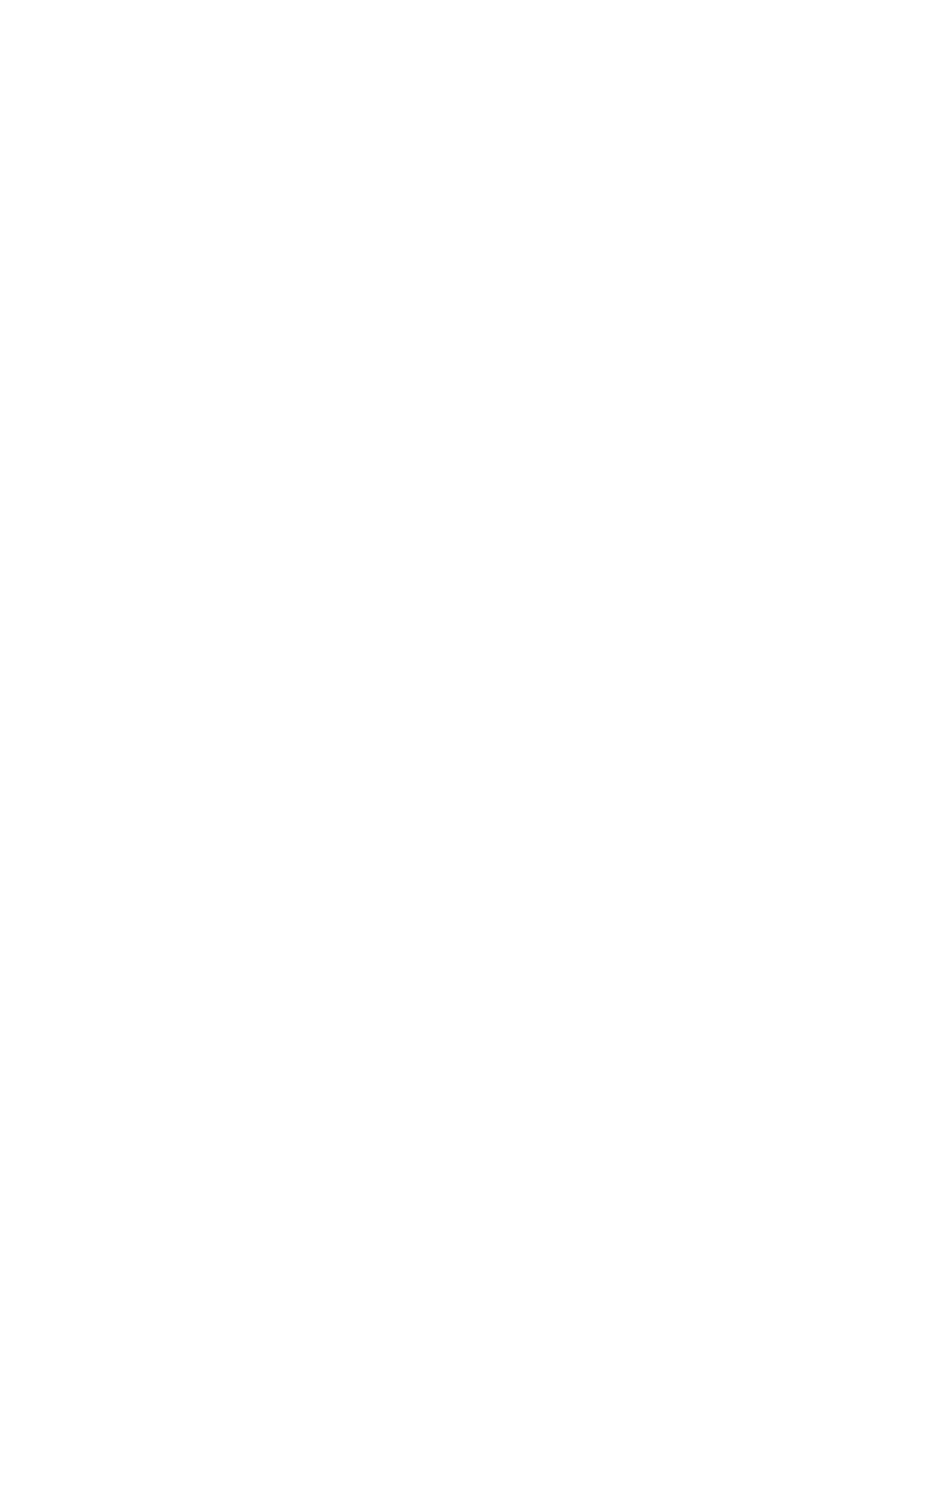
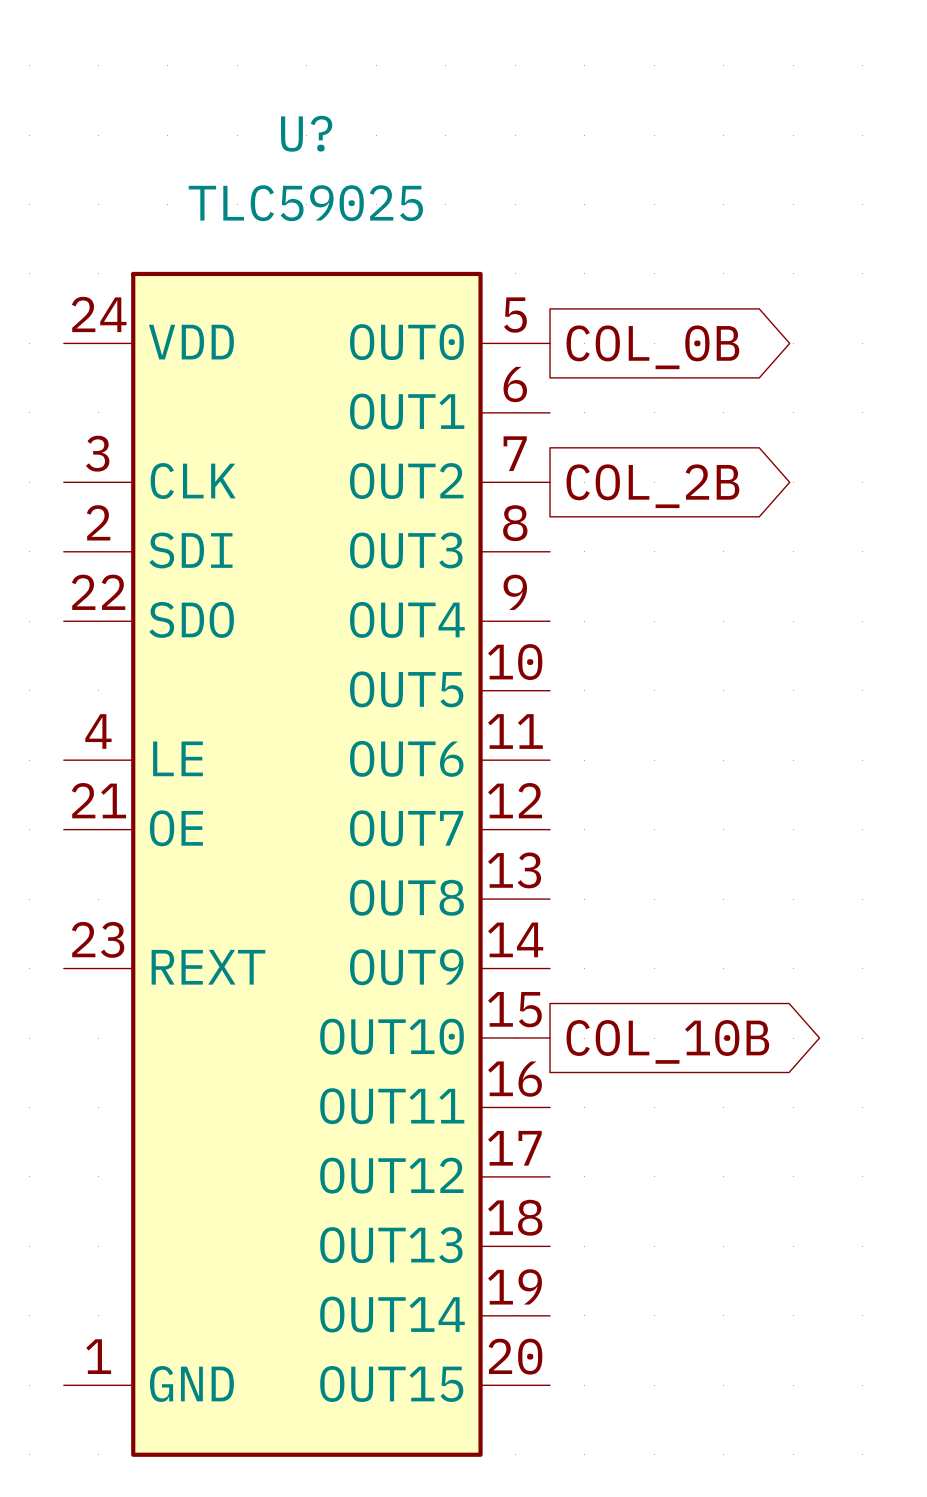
global label: none -> COL_0B (652, 347)
global label: none -> COL_2B (652, 486)
U?: none -> TLC59025 (306, 864)
global label: none -> COL_10B (667, 1041)

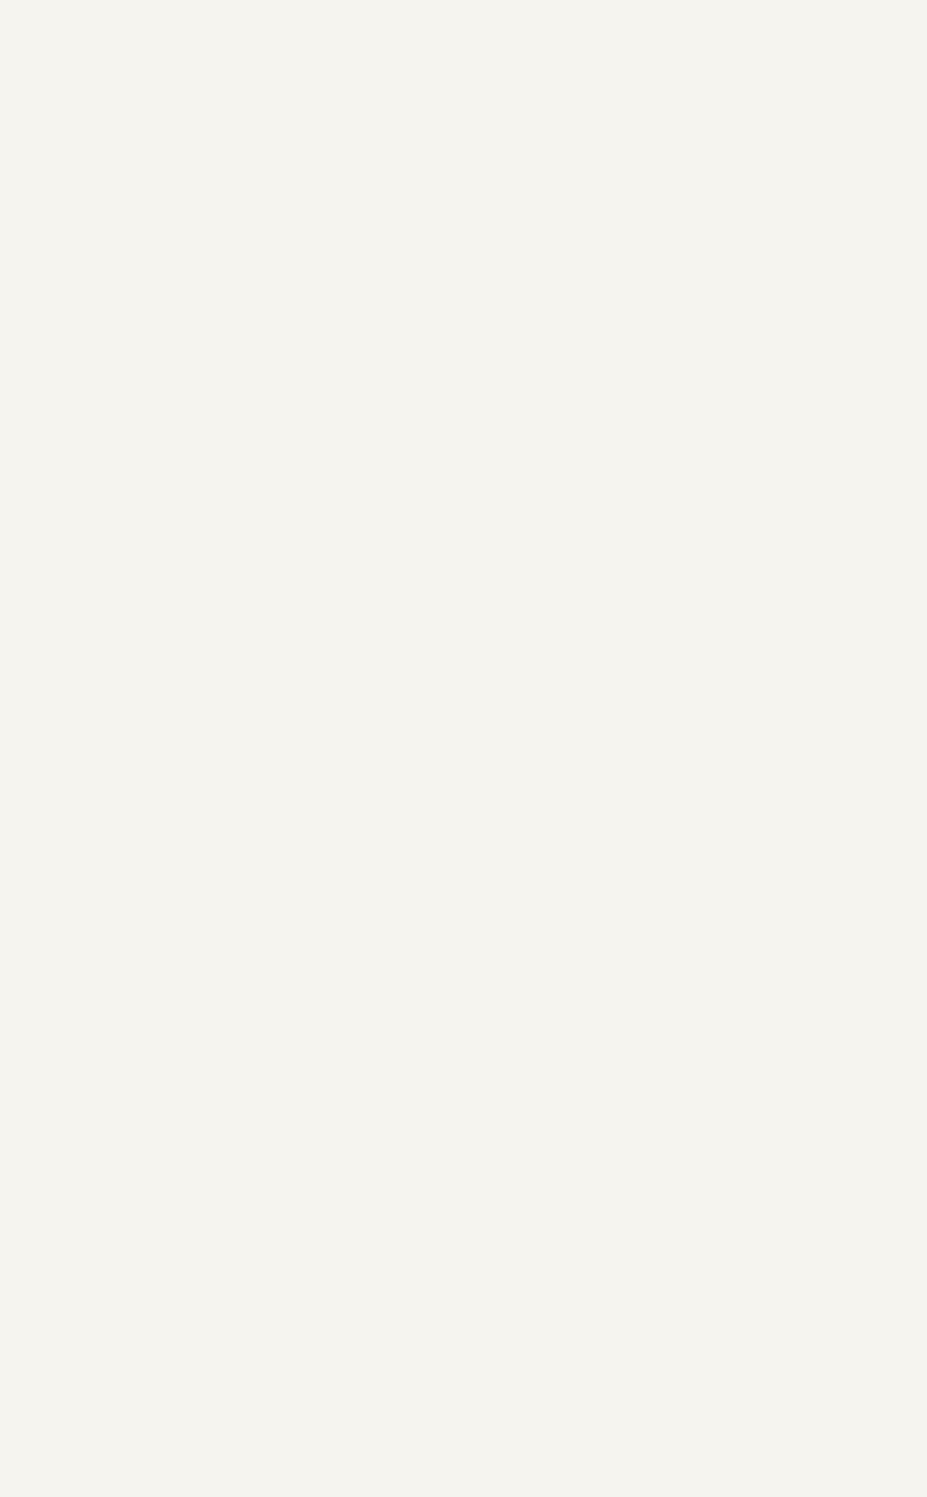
global label: COL_0B (652, 347) -> none
global label: COL_2B (652, 486) -> none
U?: TLC59025 (306, 864) -> none
global label: COL_10B (667, 1041) -> none

